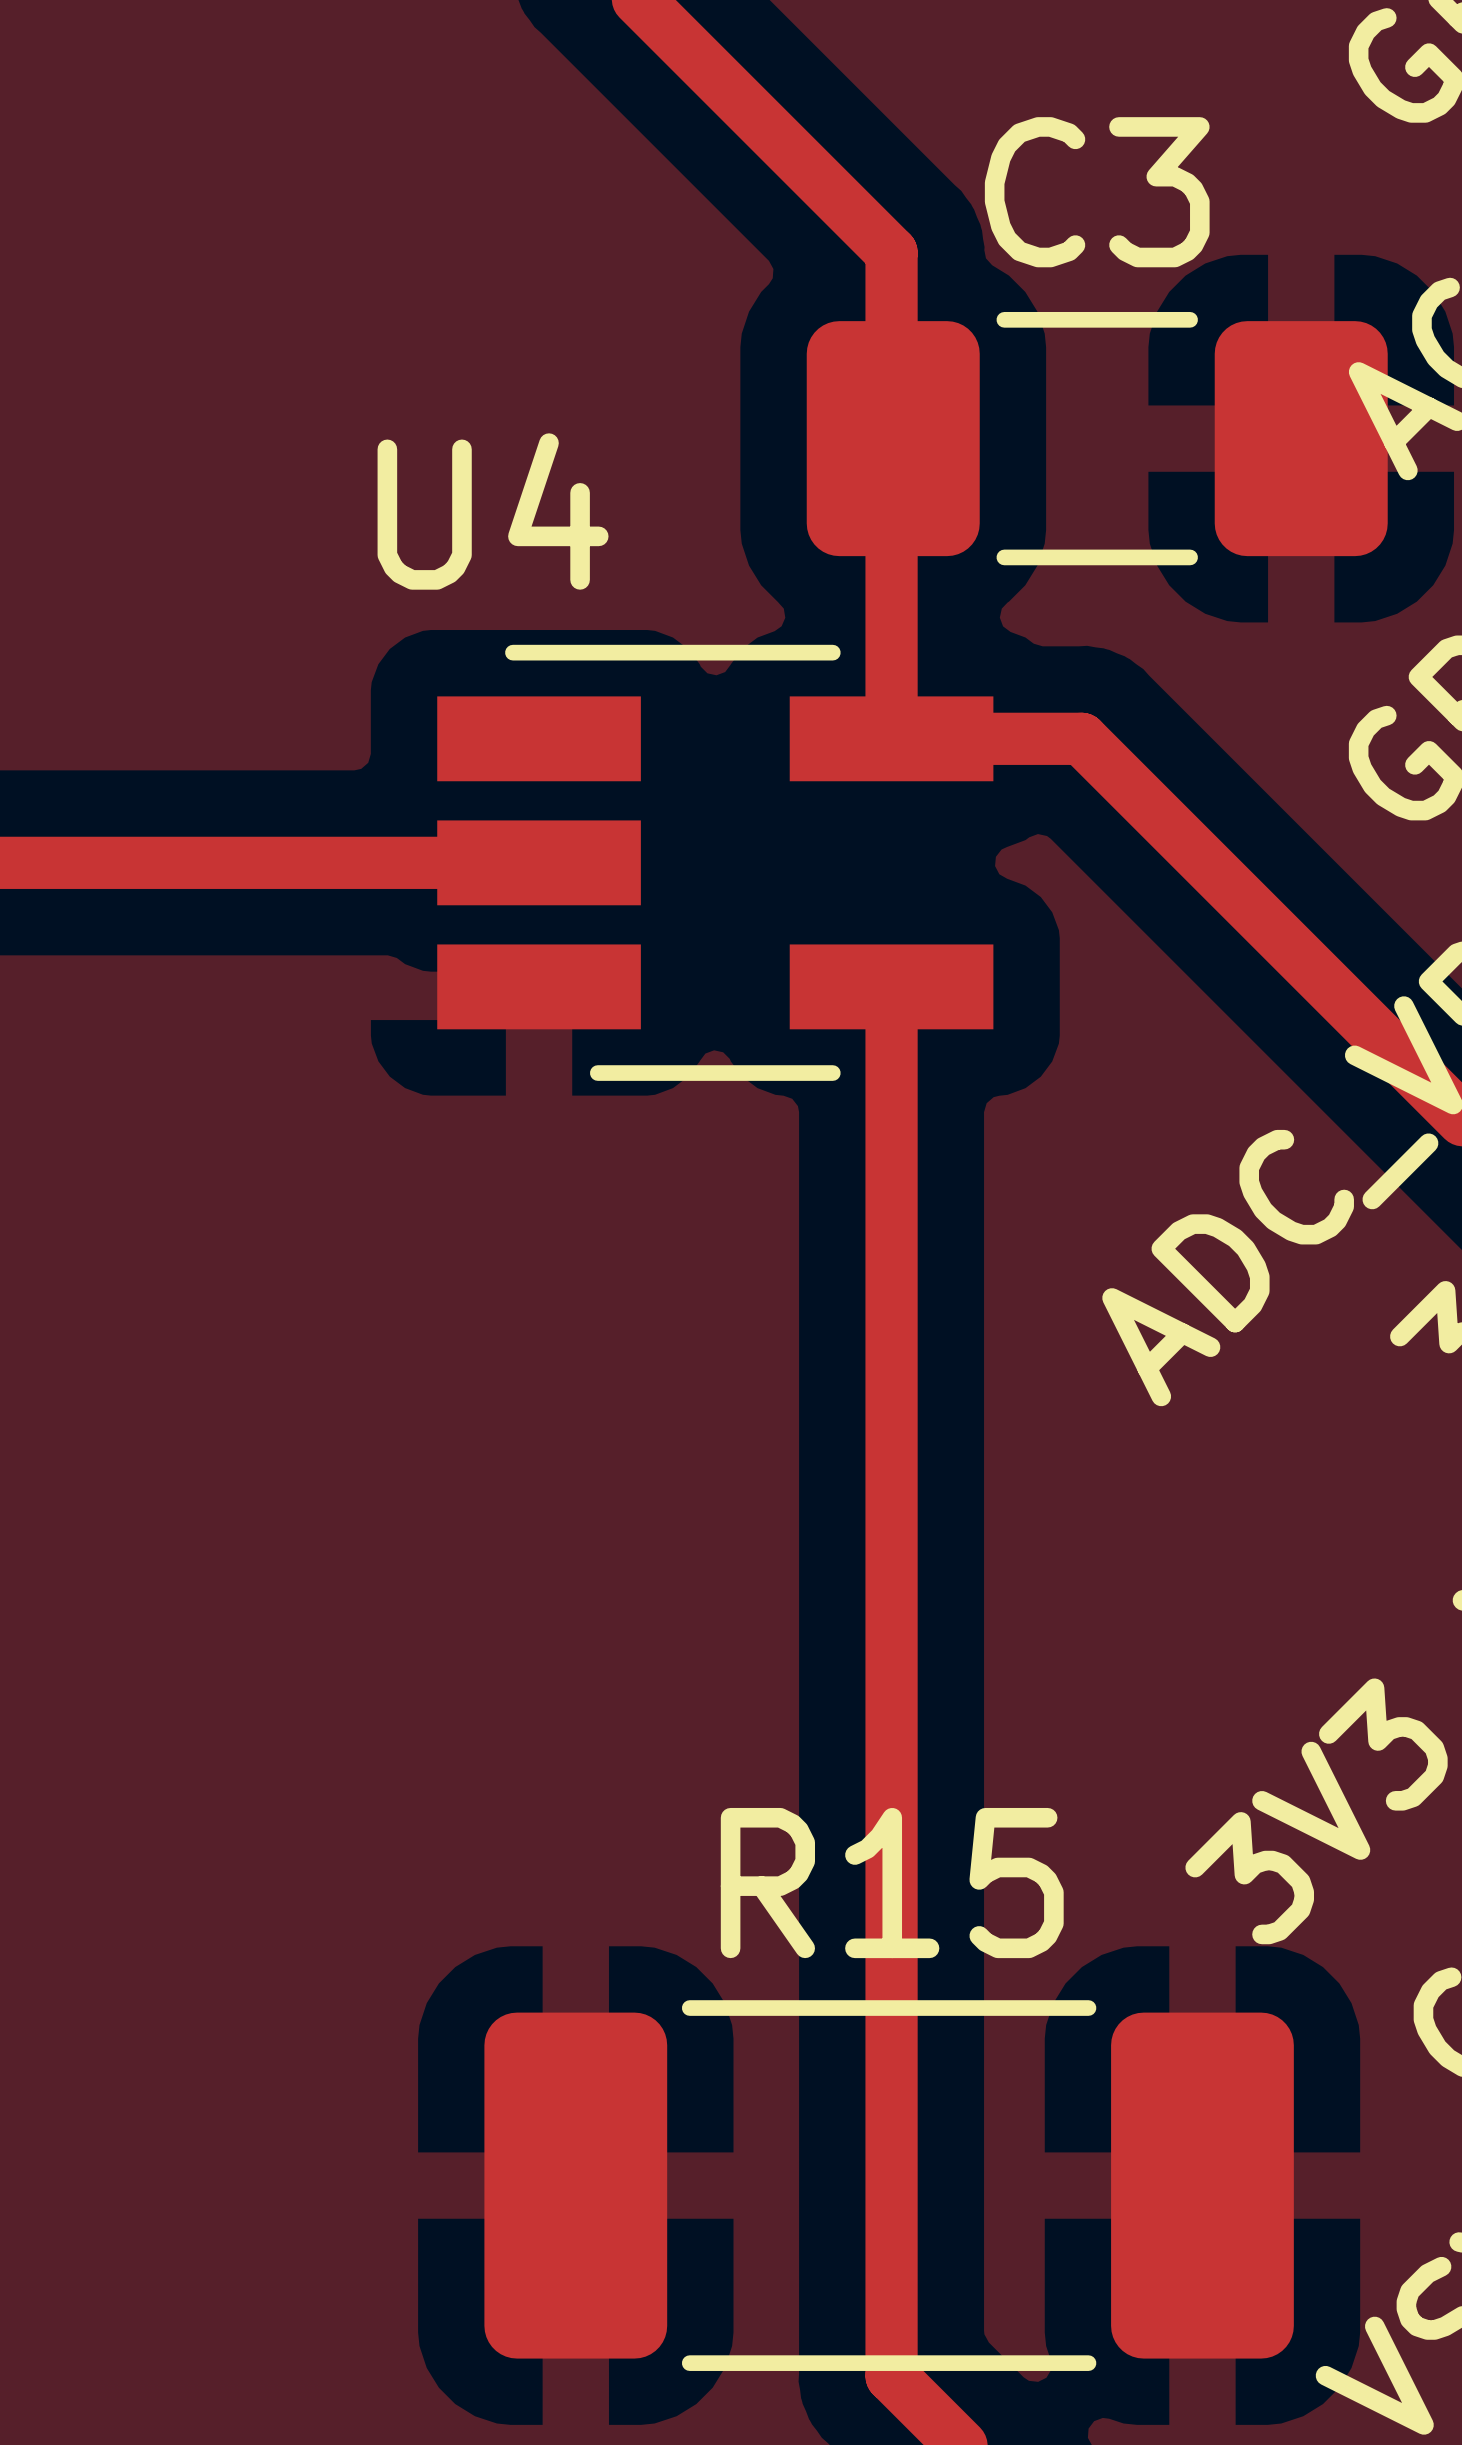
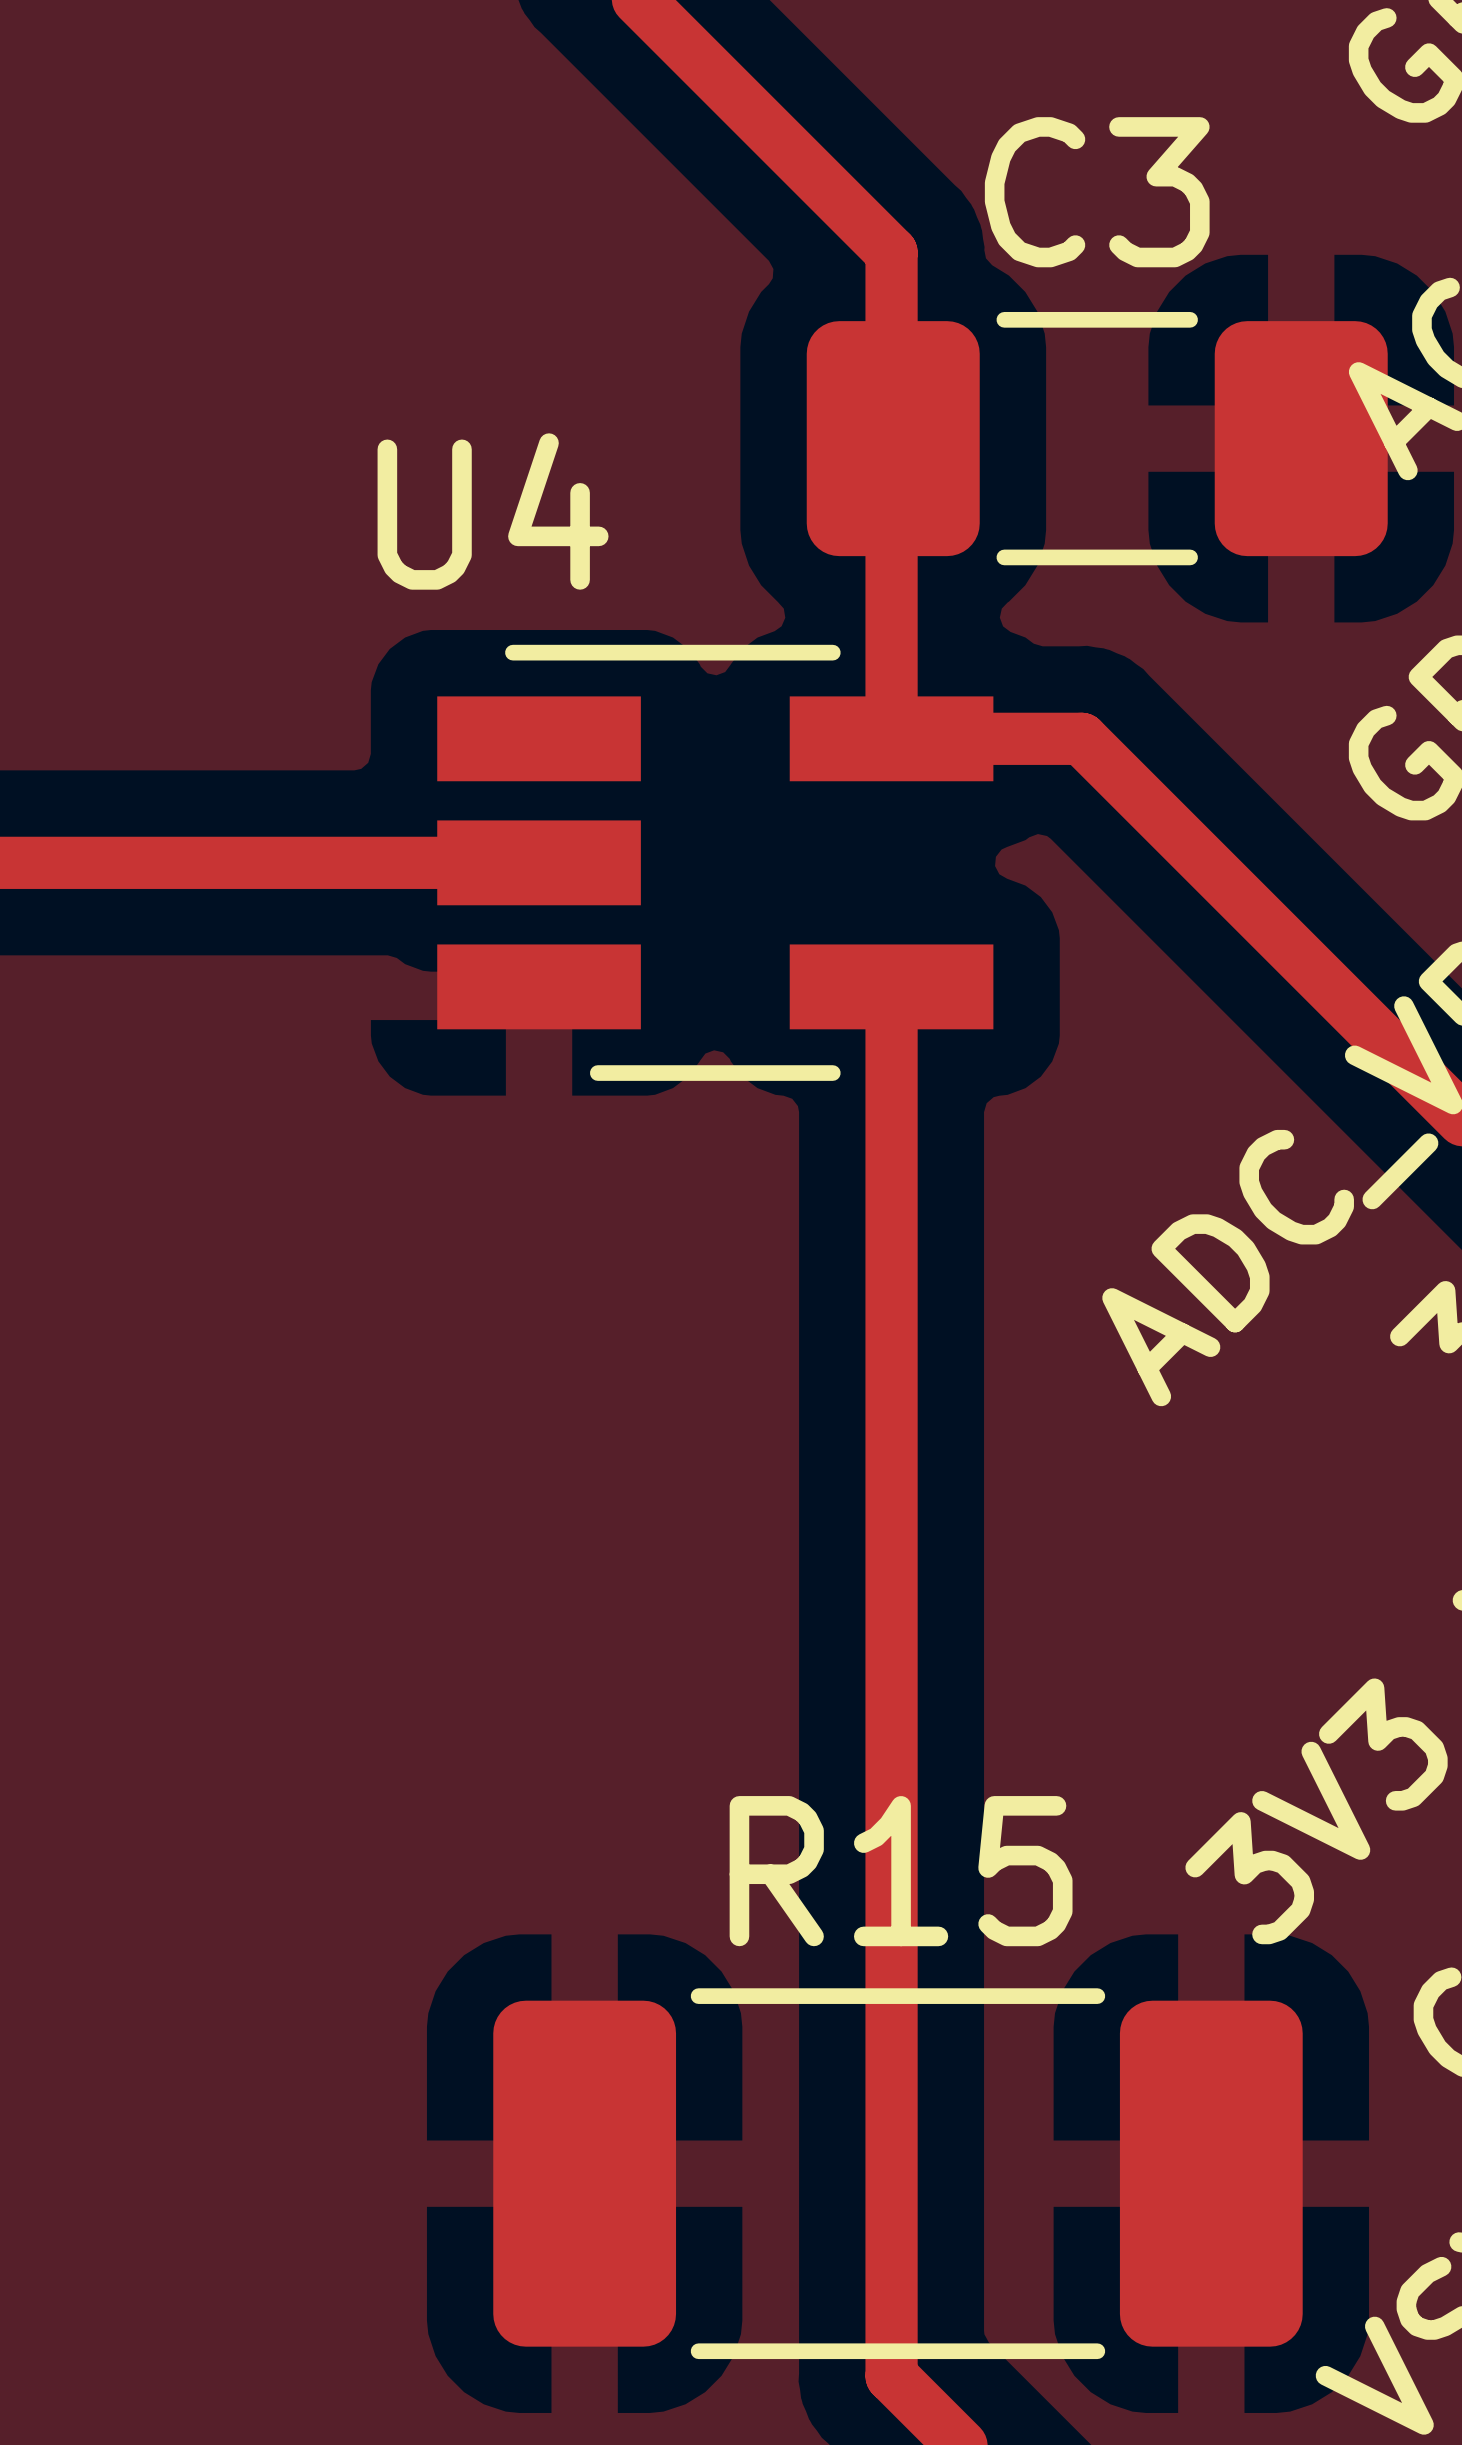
R15 position: (889, 2185) -> (897, 2173)

